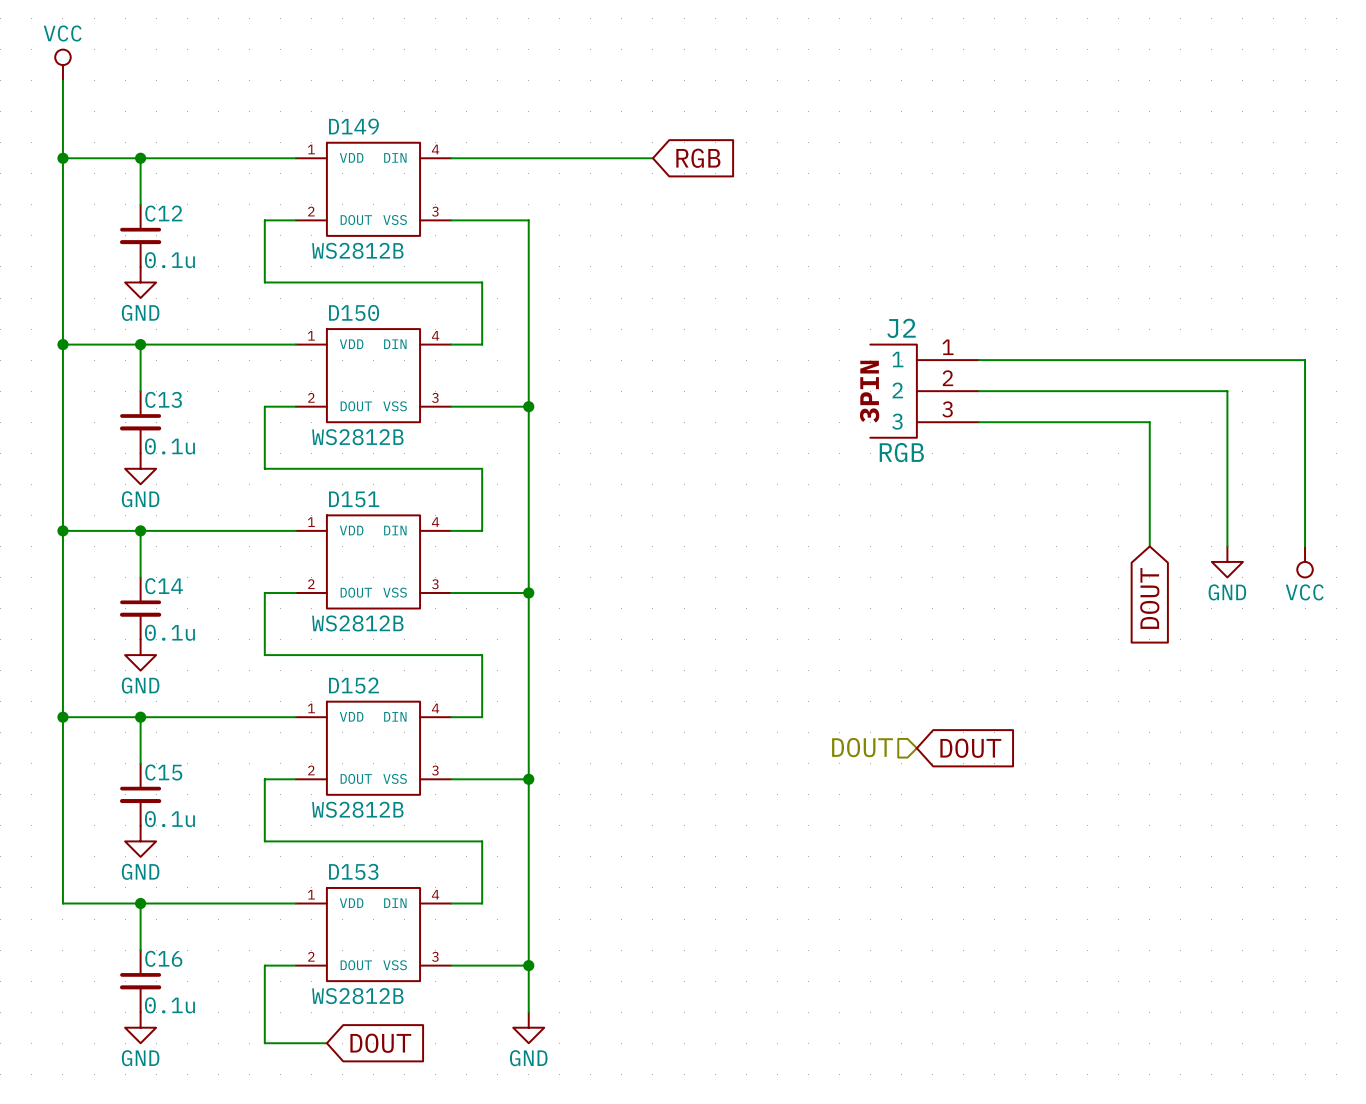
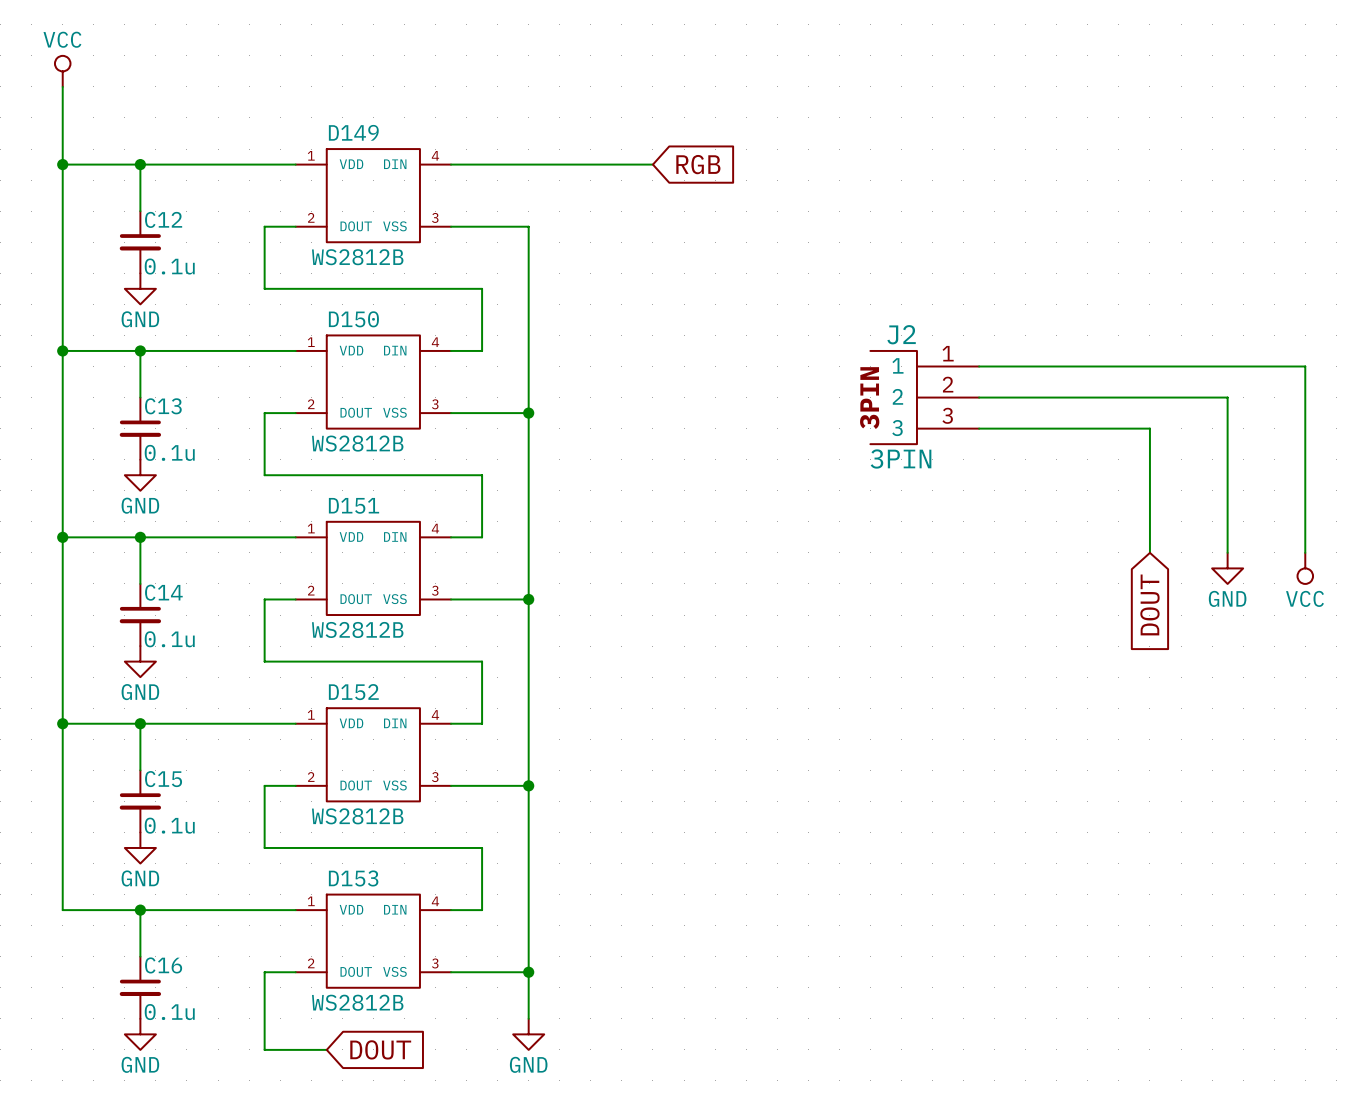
J2 value: RGB (901, 452) -> 3PIN (901, 458)
hierarchical label: DOUT (862, 747) -> none
global label: DOUT (970, 748) -> none

